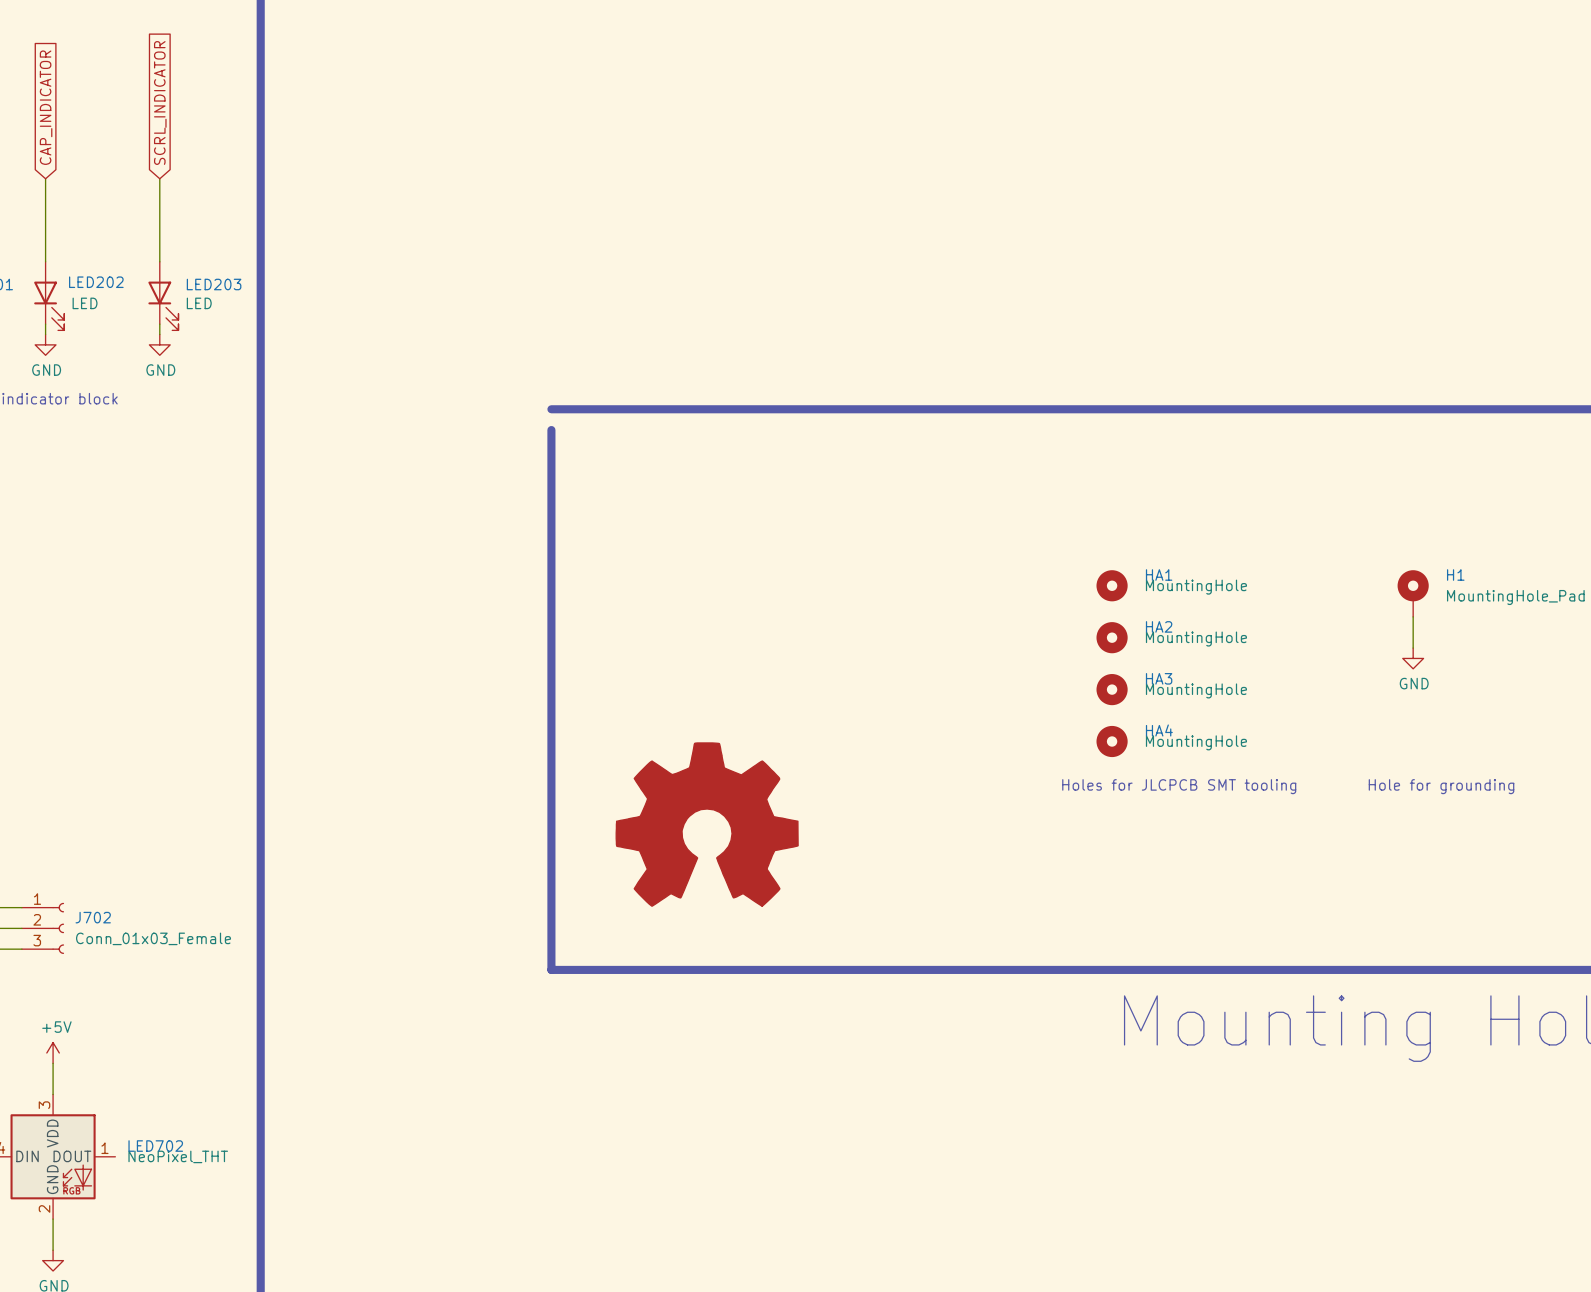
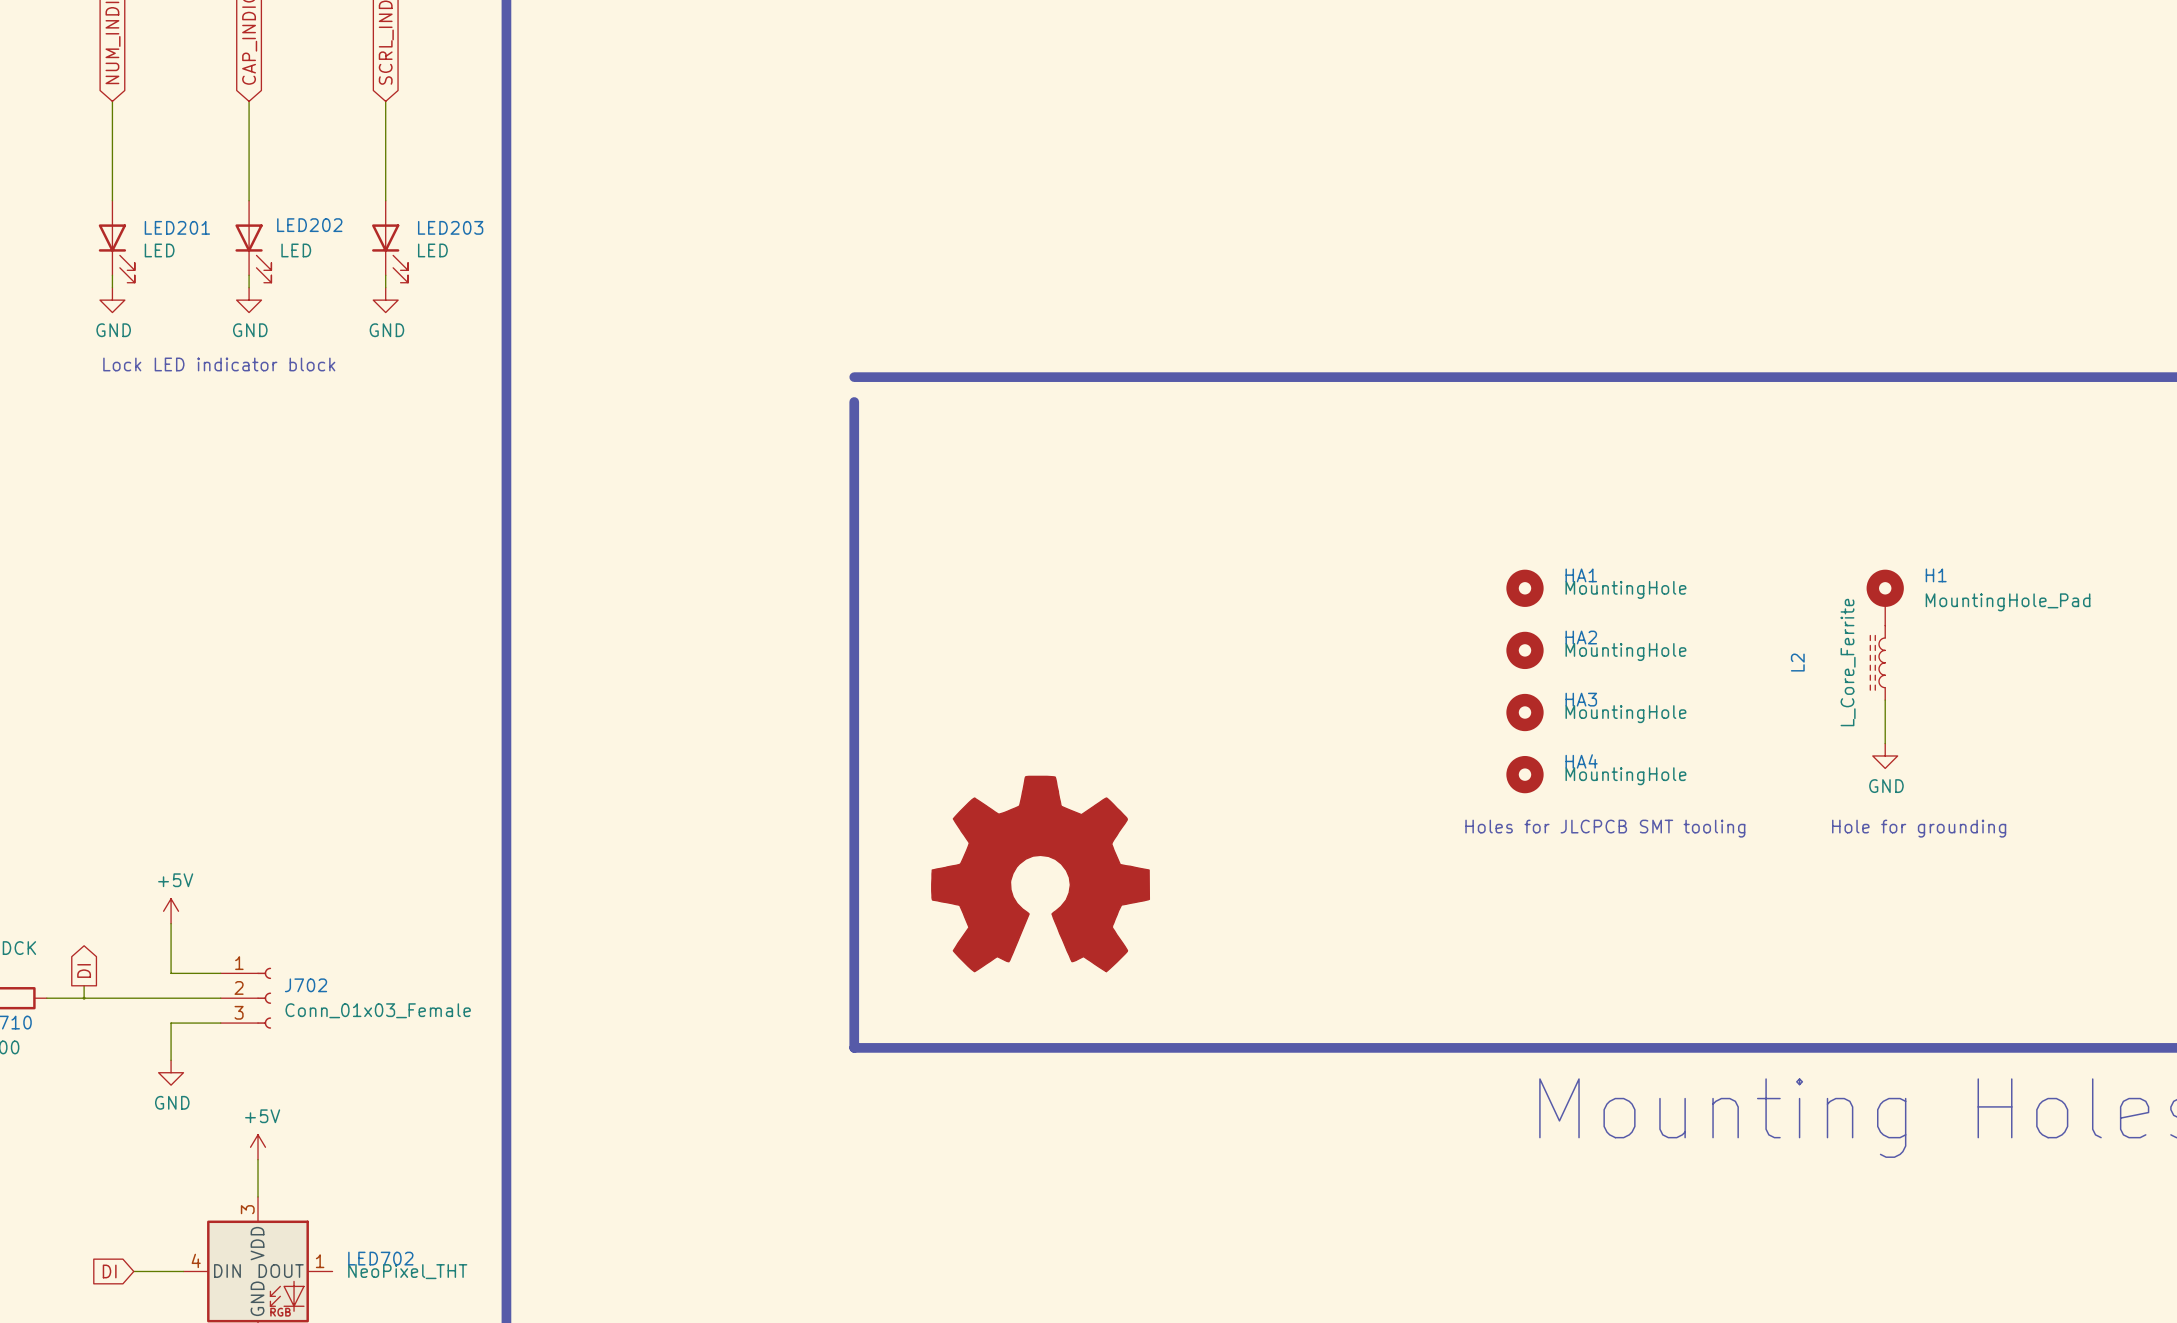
wire: (1413, 616) (1413, 648) -> none
L2: none -> L_Core_Ferrite (1877, 662)
power symbol position: GND (1413, 658) -> GND (1885, 755)
wire: none -> (1885, 700) (1885, 743)

